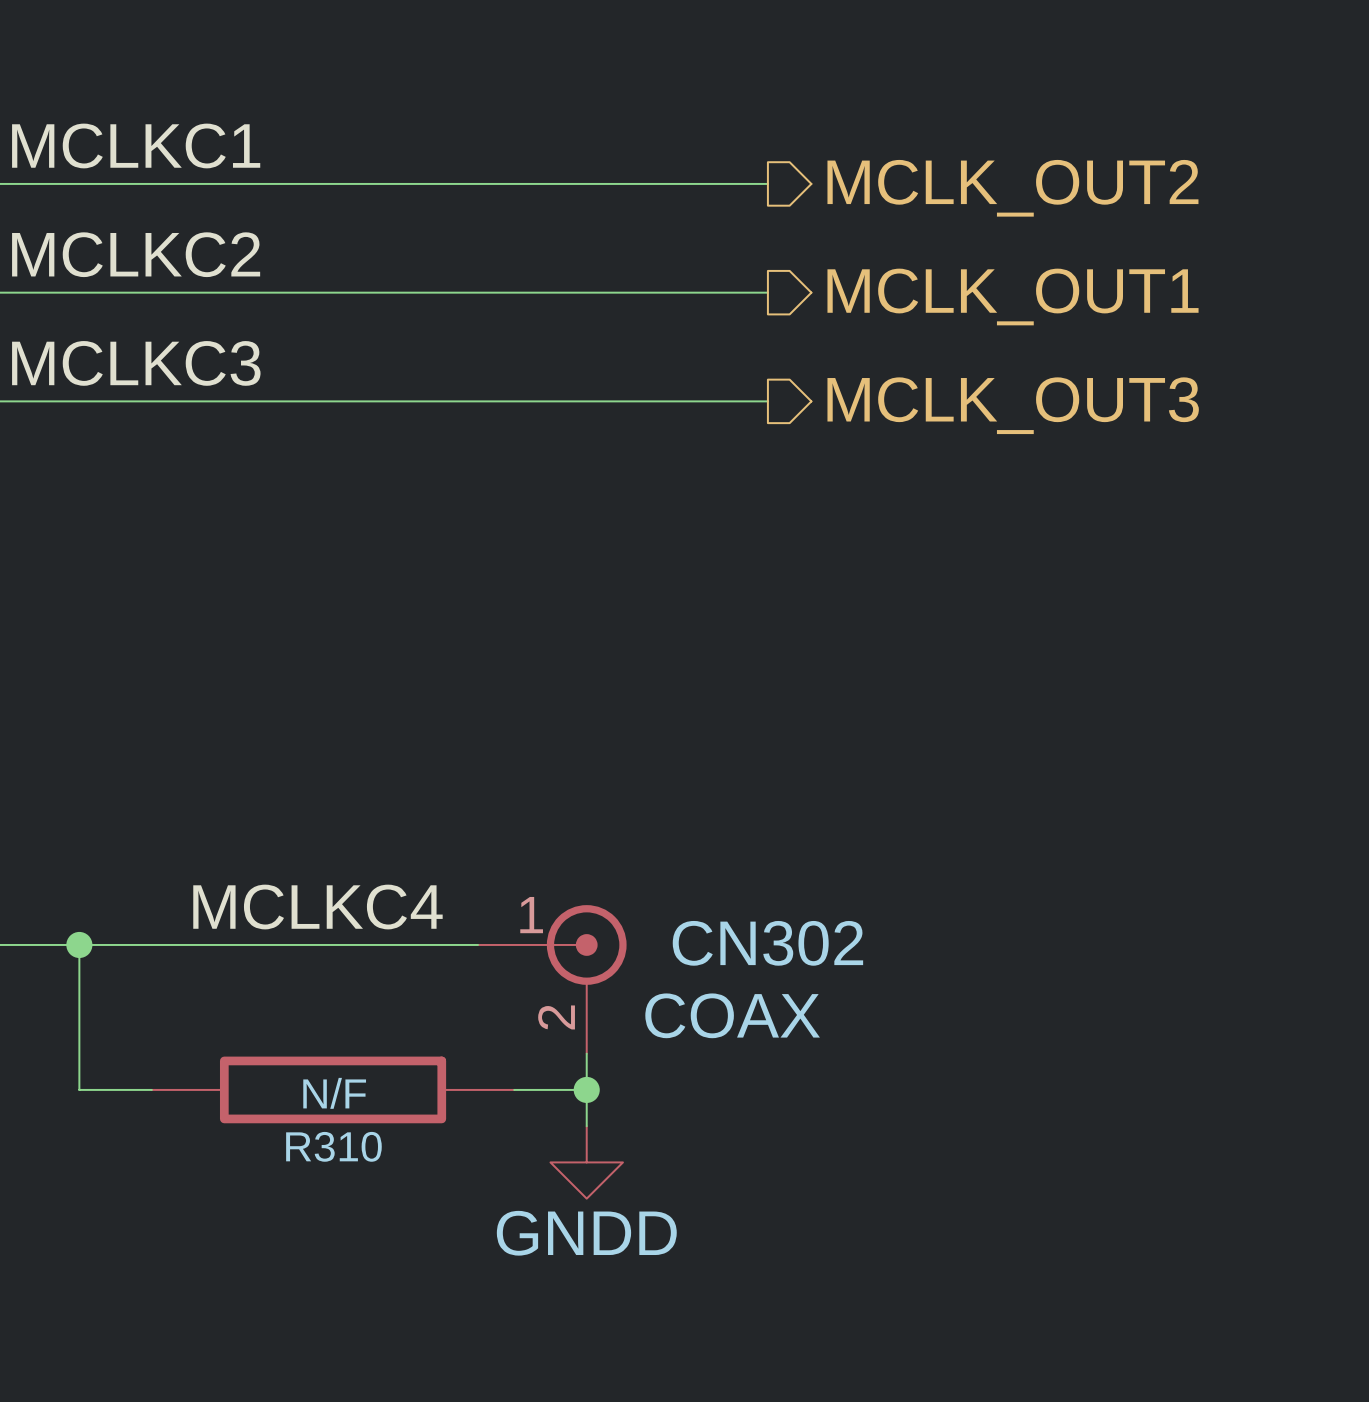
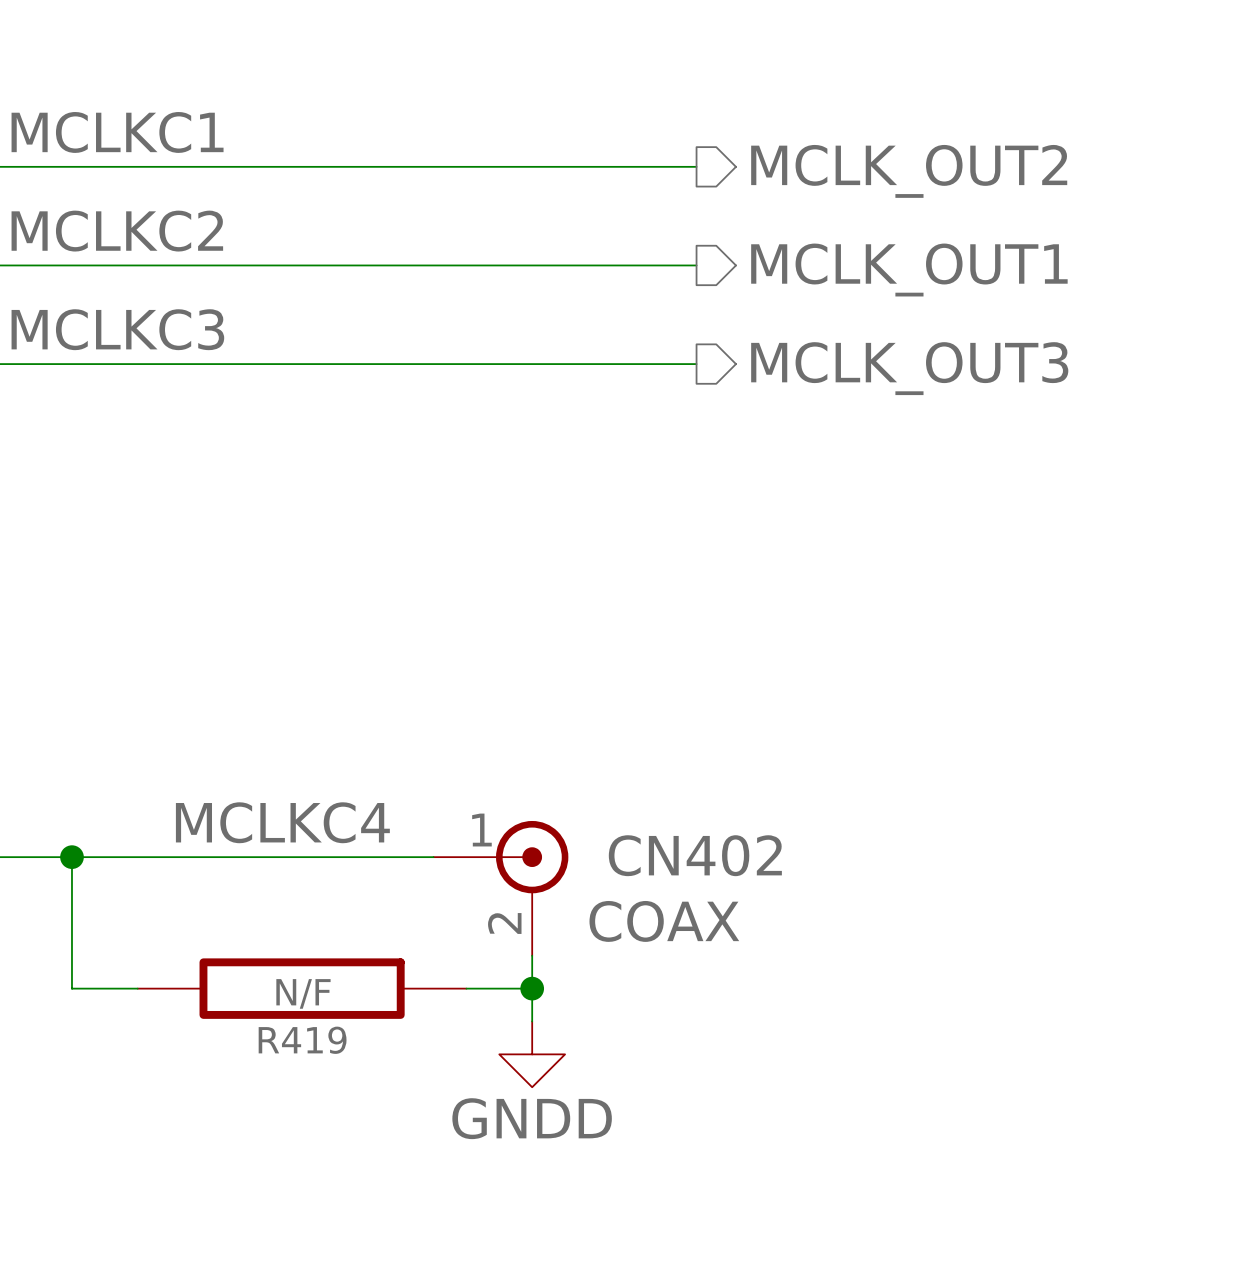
CN302 name: CN302 (767, 943) -> CN402 (695, 855)
R310 name: R310 (333, 1146) -> R419 (302, 1040)

